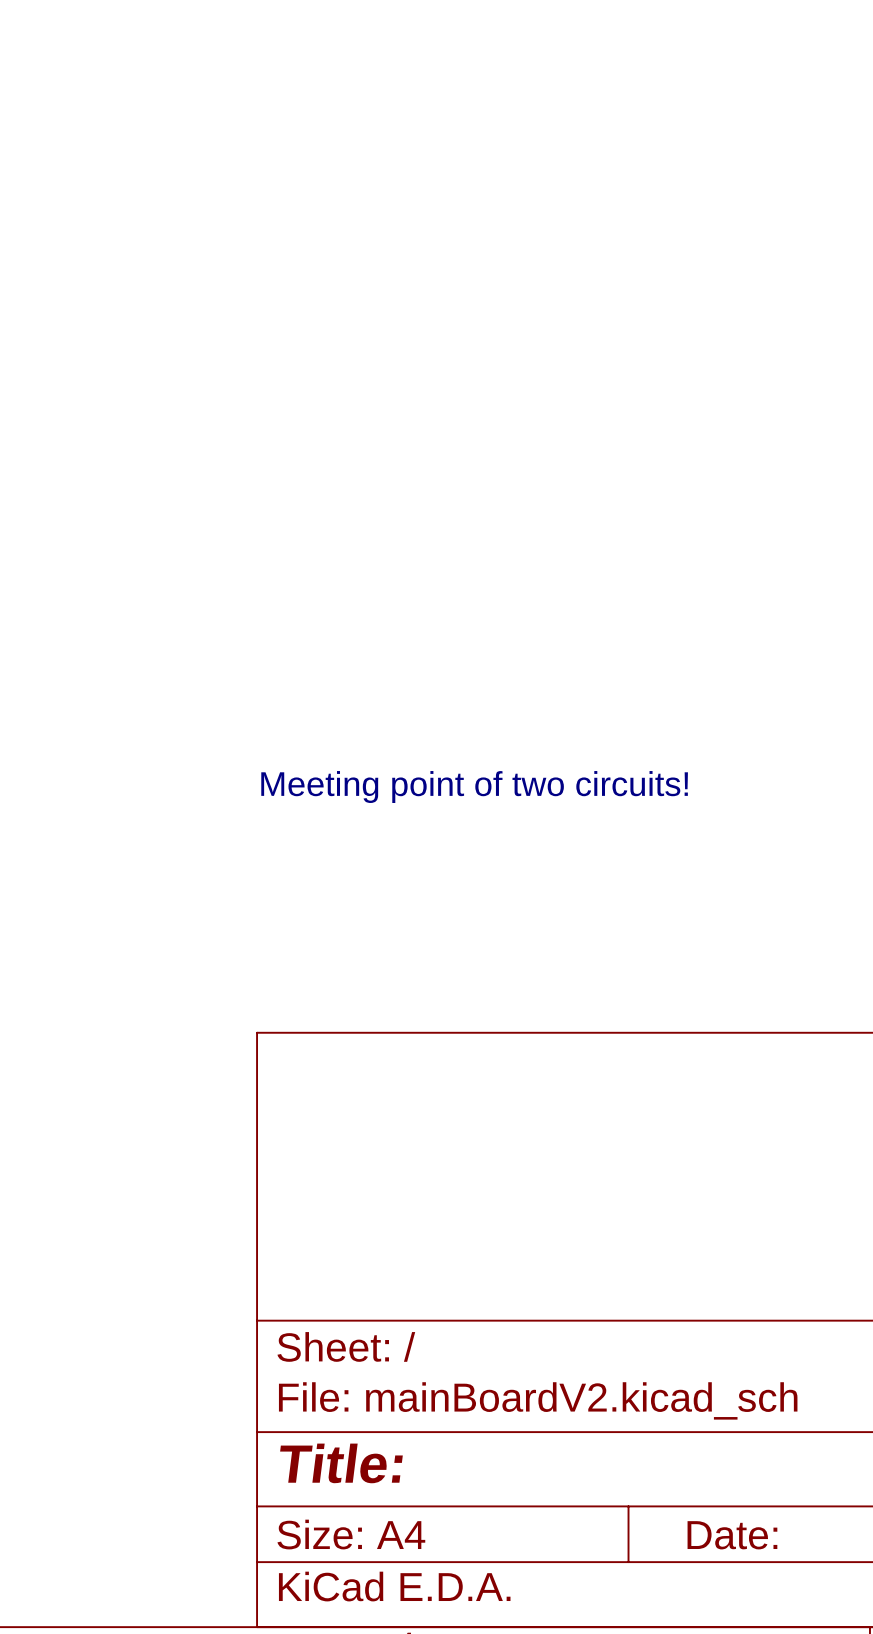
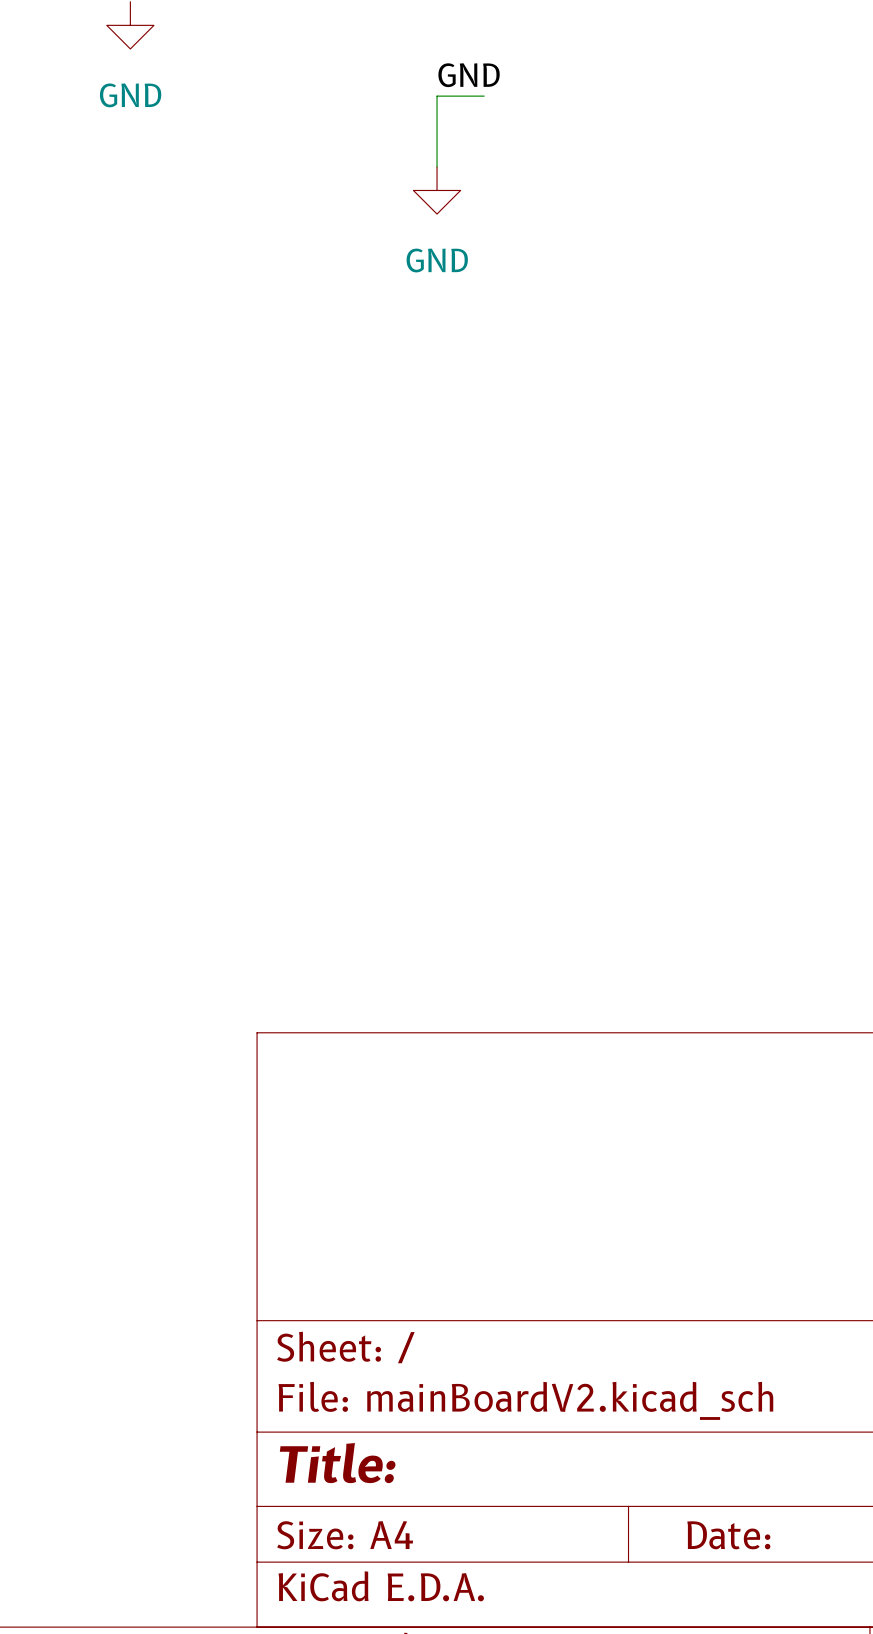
power symbol: none -> GND (130, 25)
label: none -> GND (469, 75)
wire: none -> (484, 96) (437, 96) (437, 166)
power symbol: none -> GND (437, 190)
text: Meeting point of two circuits! (474, 787) -> none

